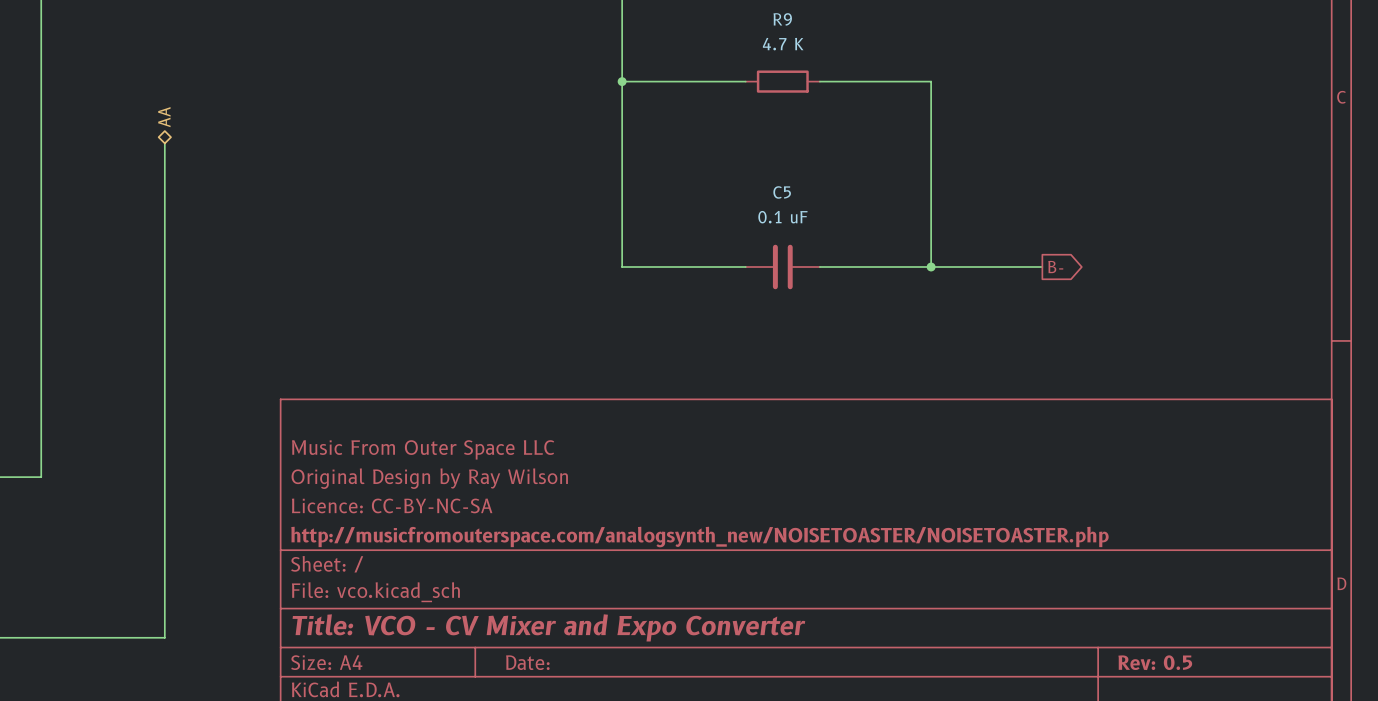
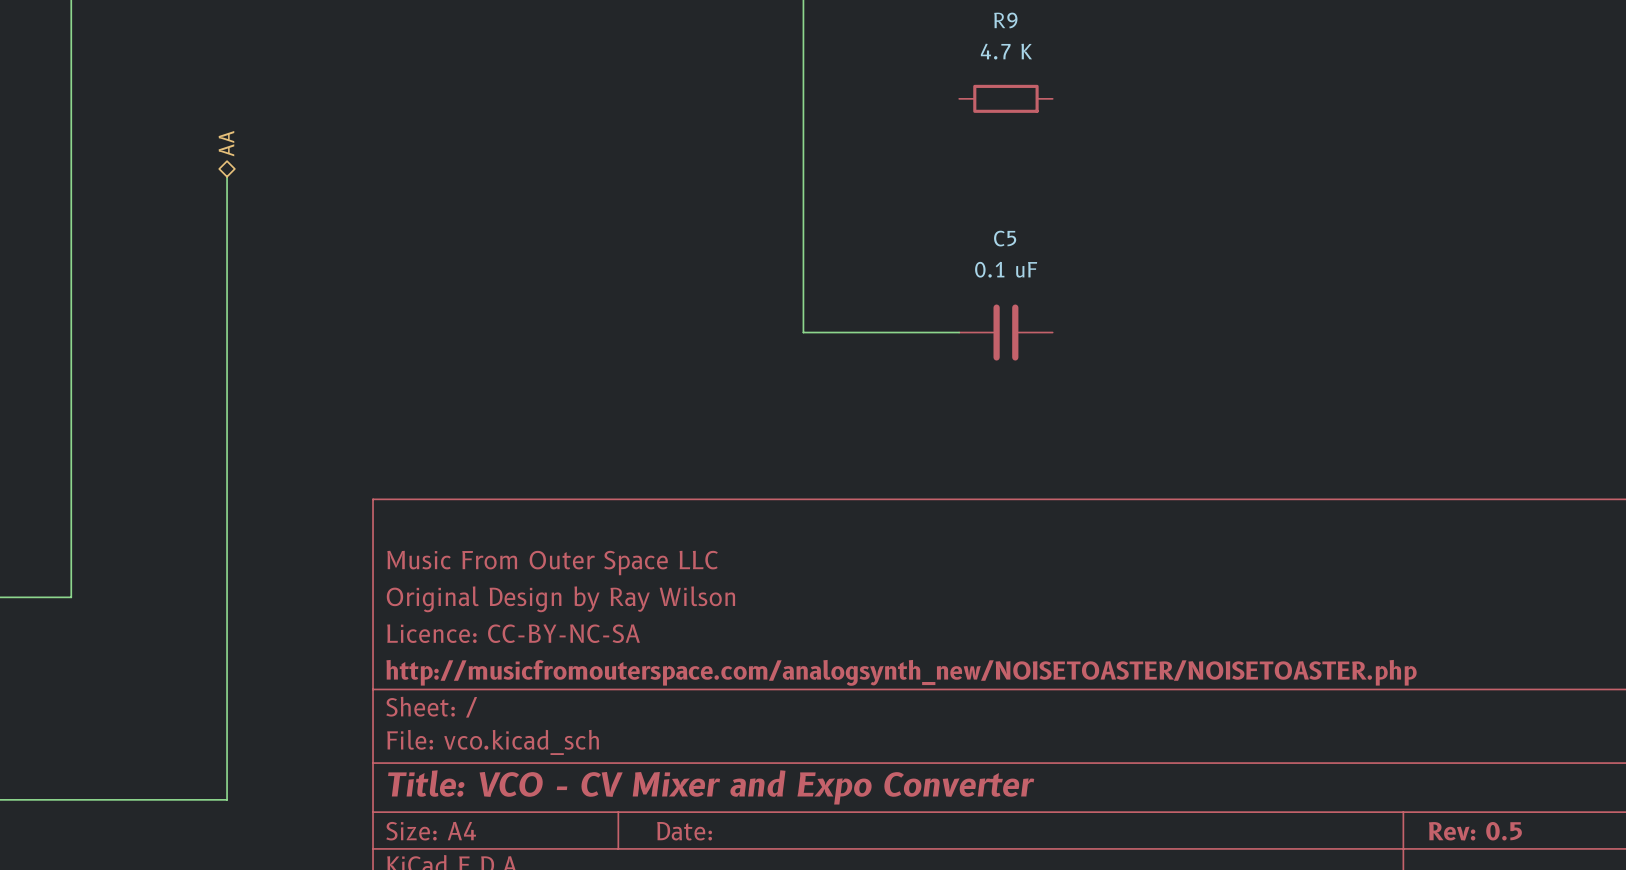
wire: (622, 81) (745, 81) -> none
junction: (622, 81) -> none
wire: (819, 81) (931, 81) (931, 266) -> none
wire: (819, 266) (1042, 266) -> none
junction: (931, 266) -> none
global label: B- (1055, 267) -> none

